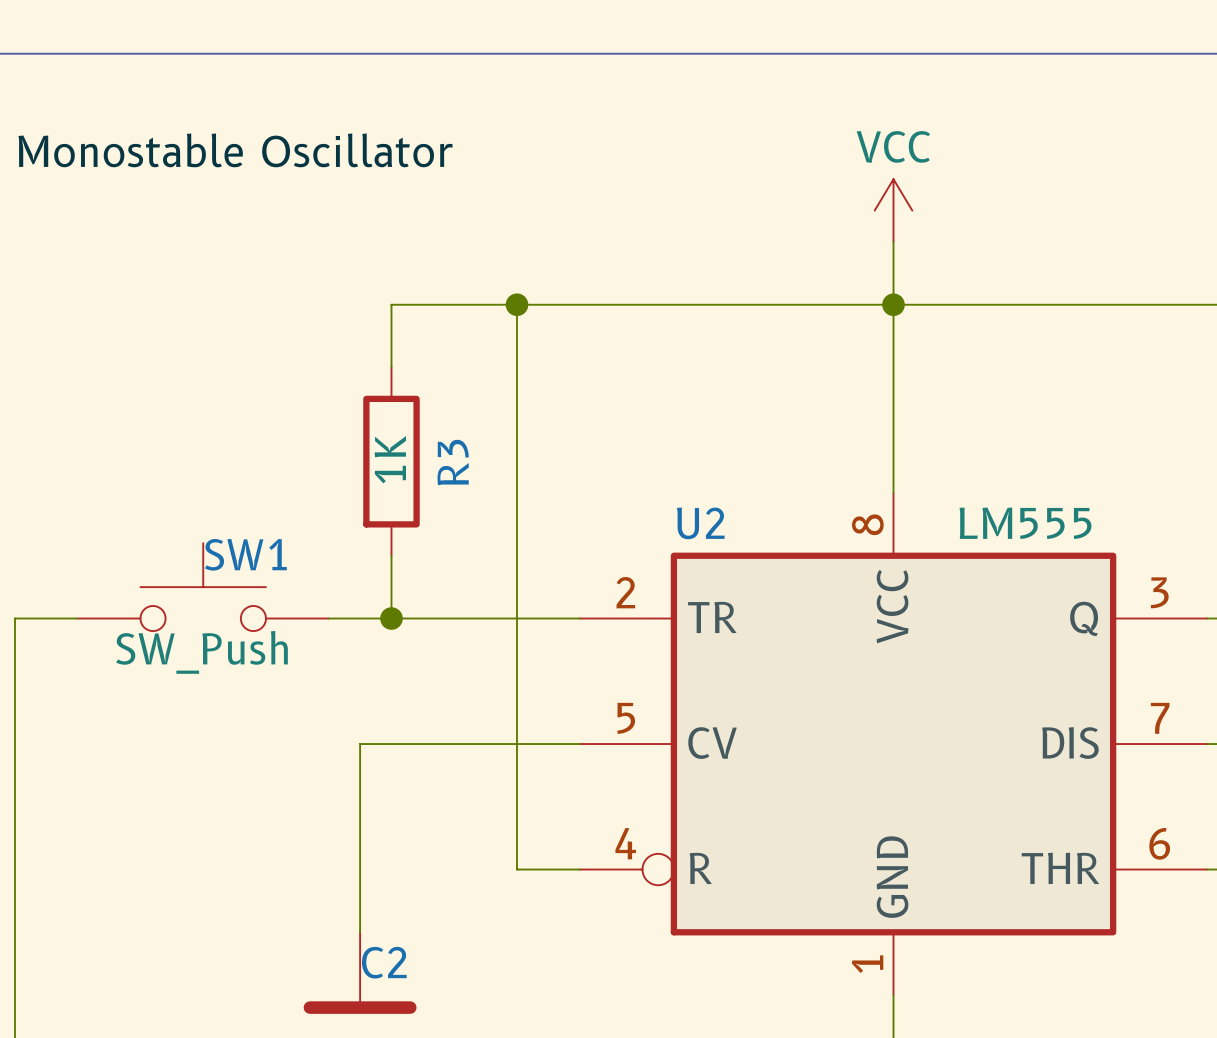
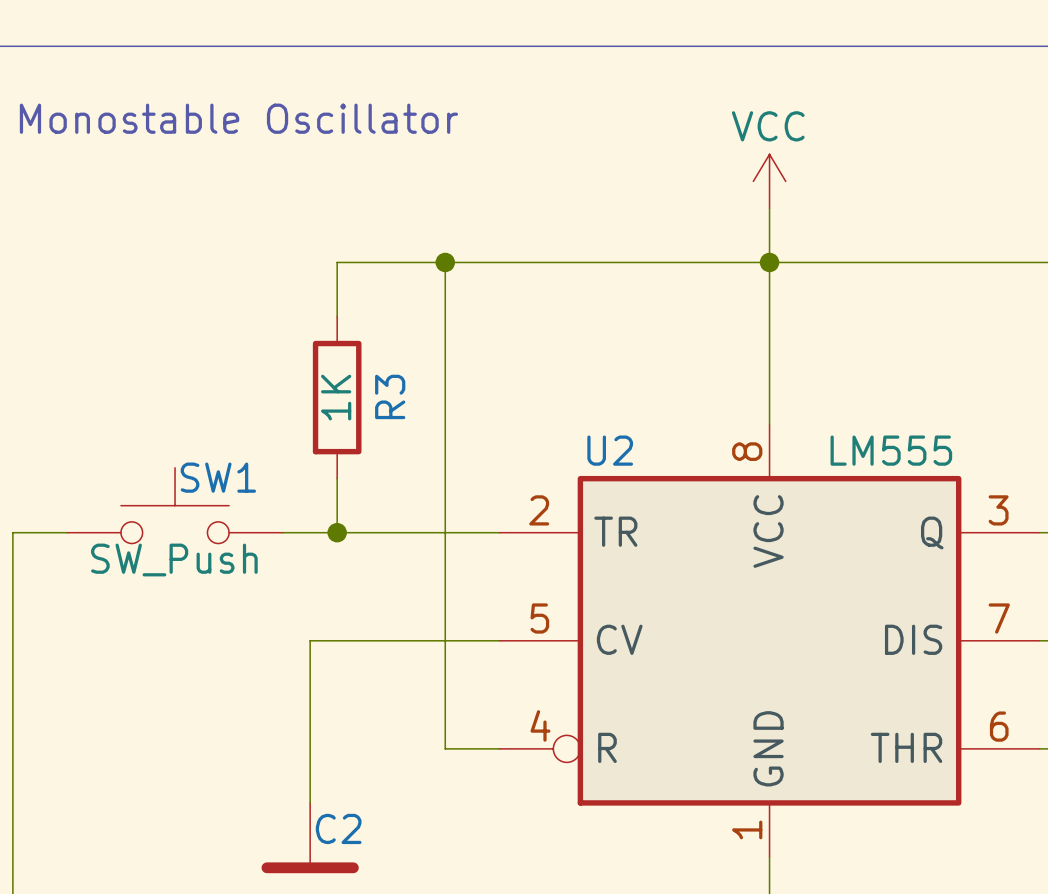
text: none -> Monostable Oscillator (238, 118)
label: Monostable Oscillator (235, 150) -> none

